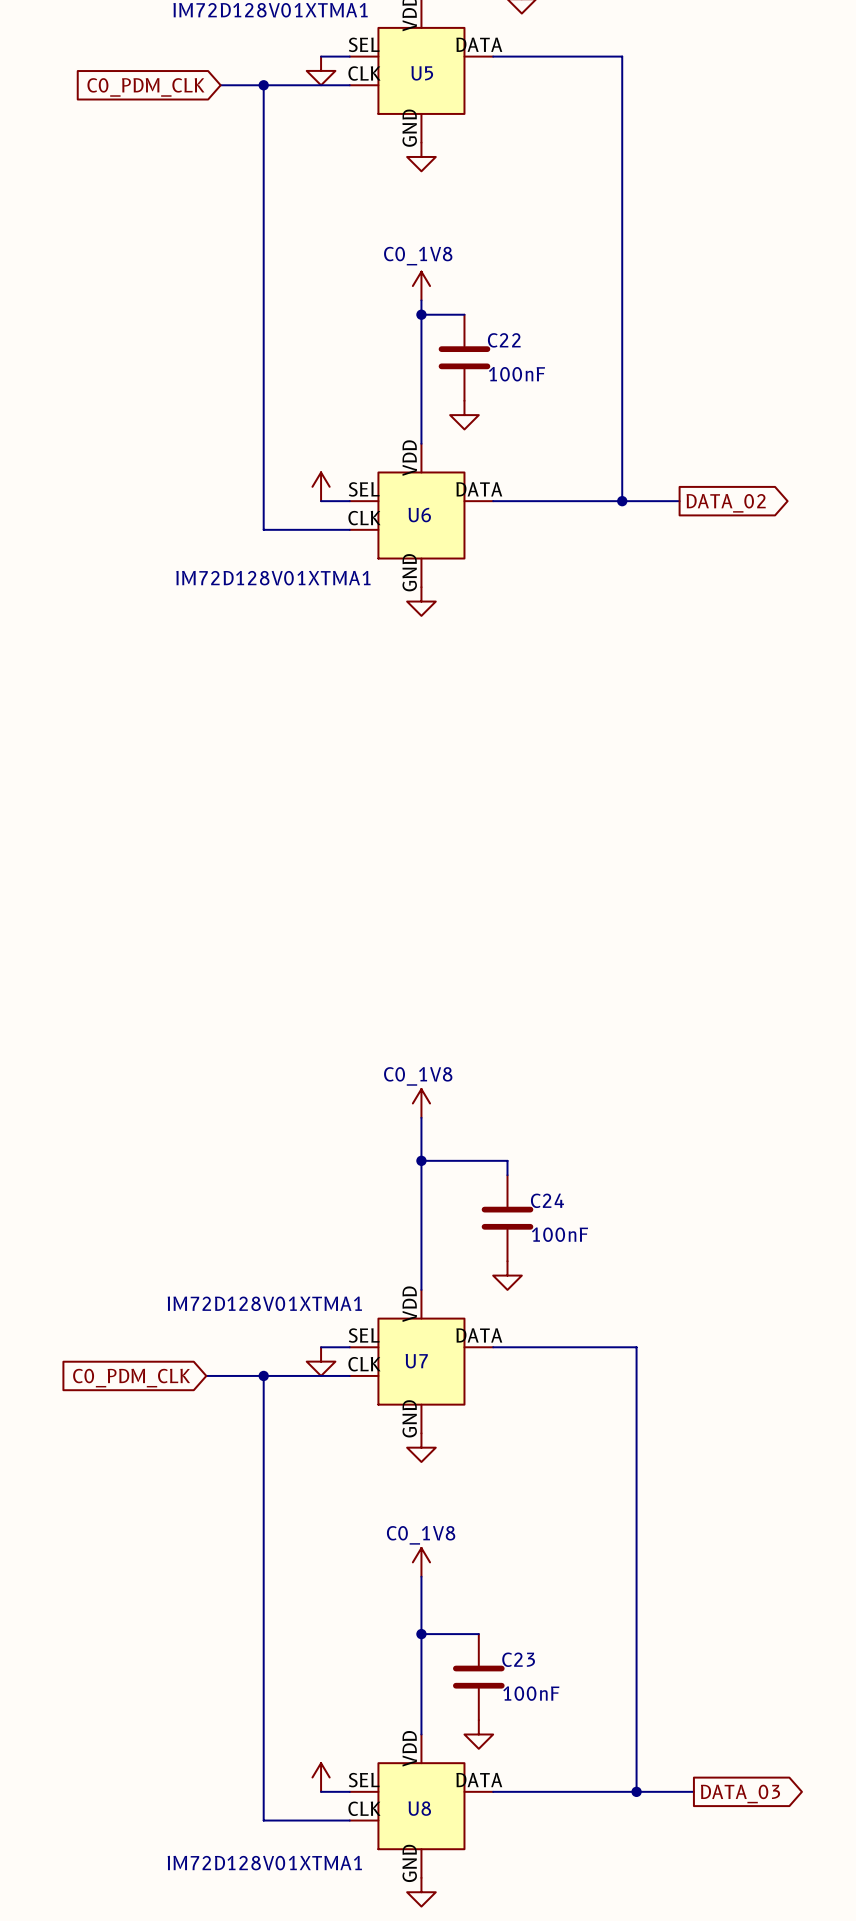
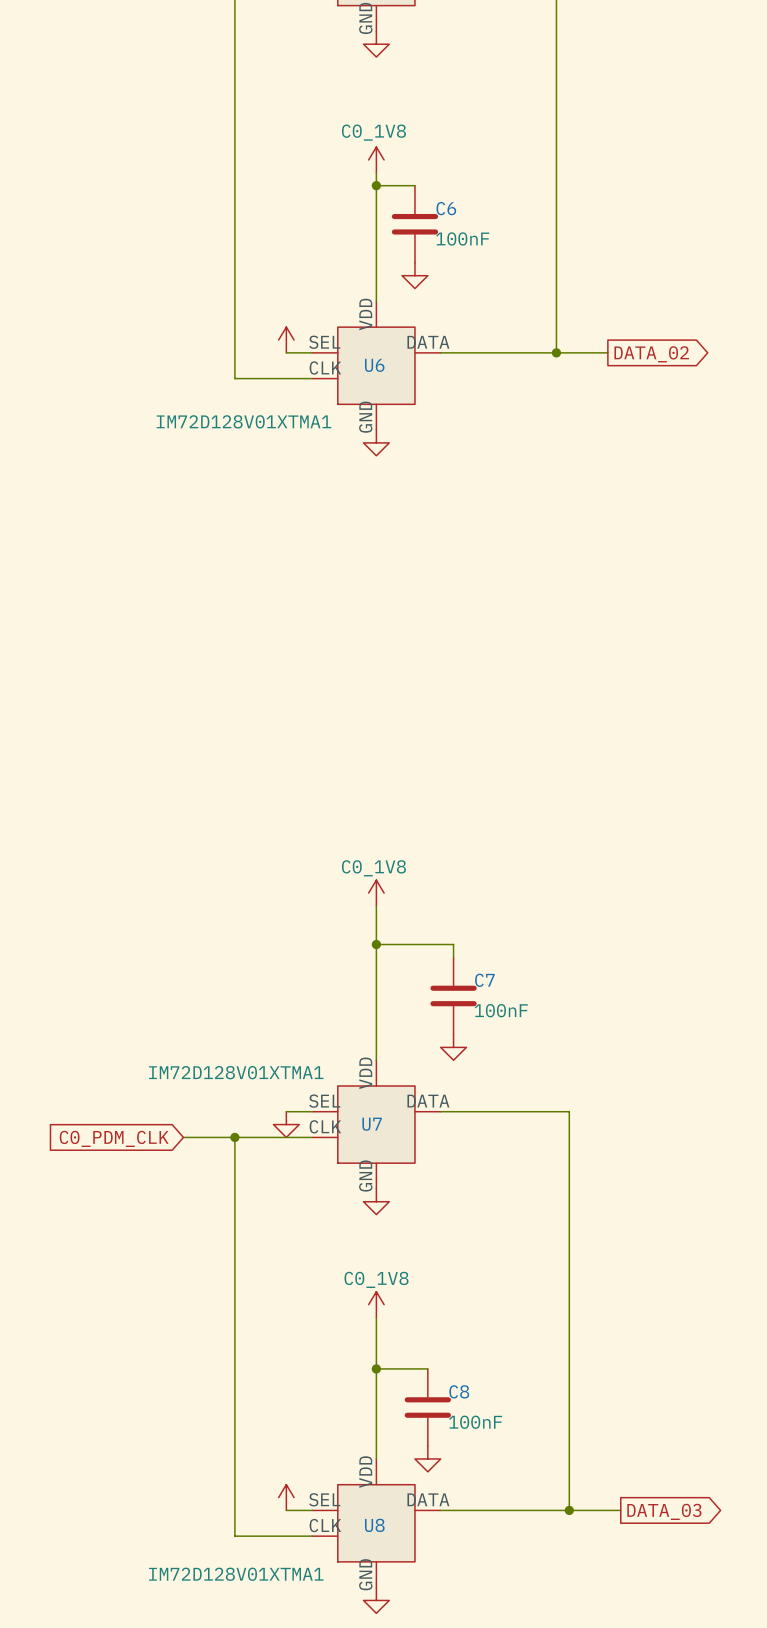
C22 name: C22 (504, 340) -> C6 (446, 208)
C24 name: C24 (547, 1200) -> C7 (484, 980)
C23 name: C23 (518, 1659) -> C8 (459, 1391)

